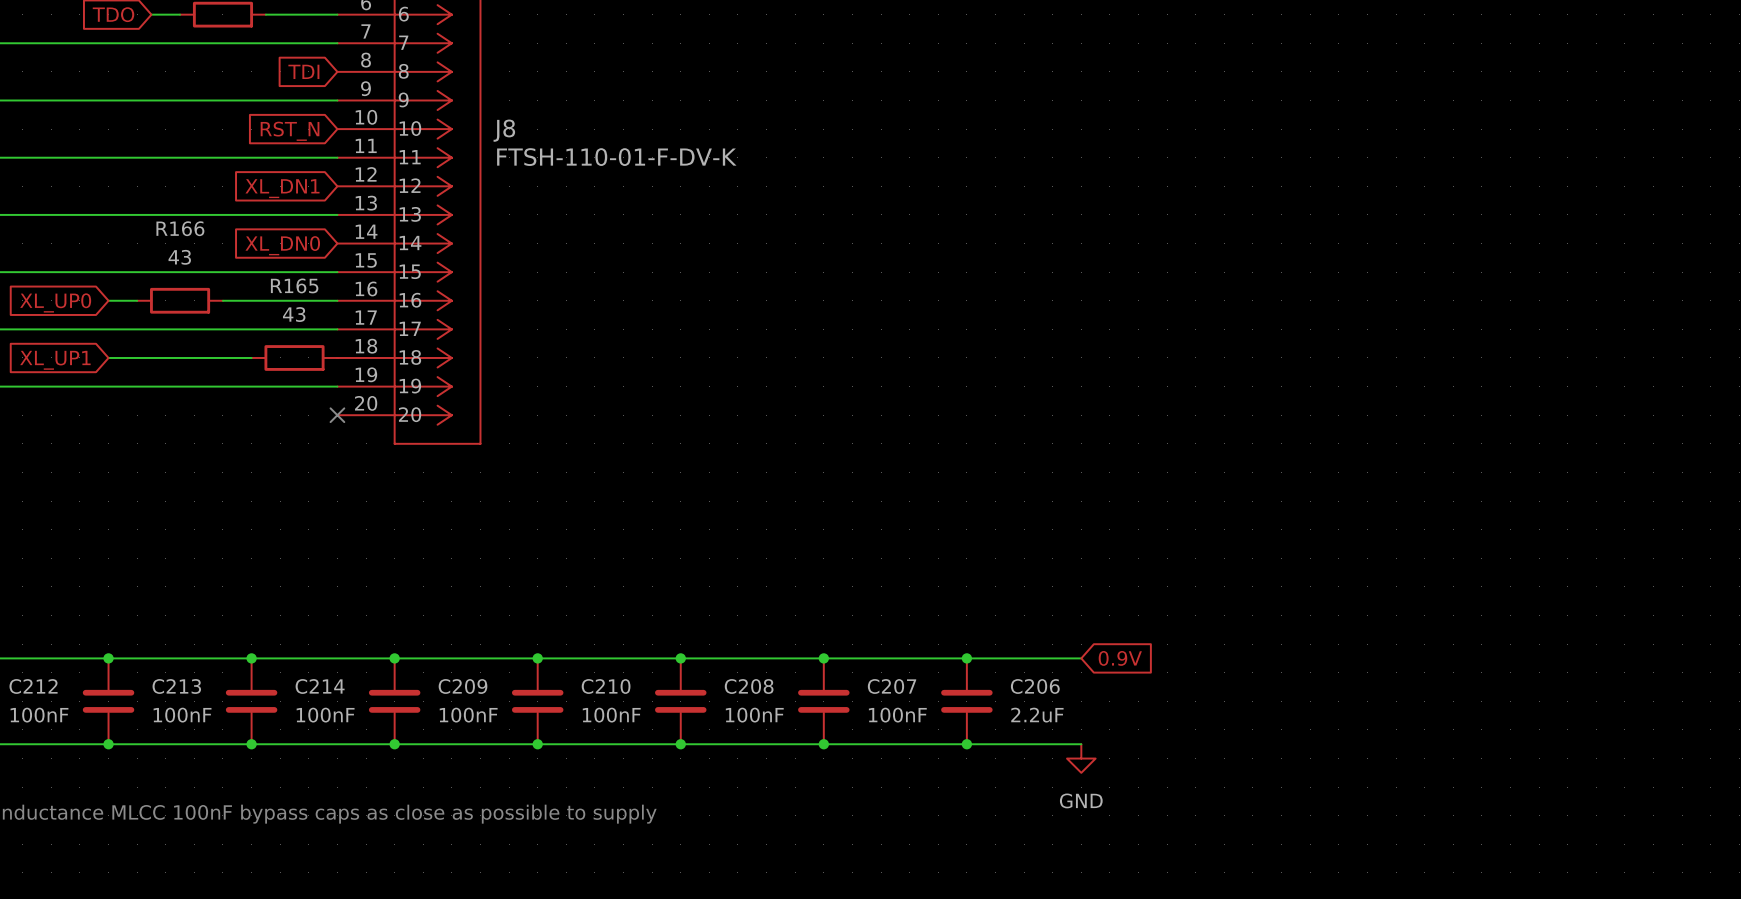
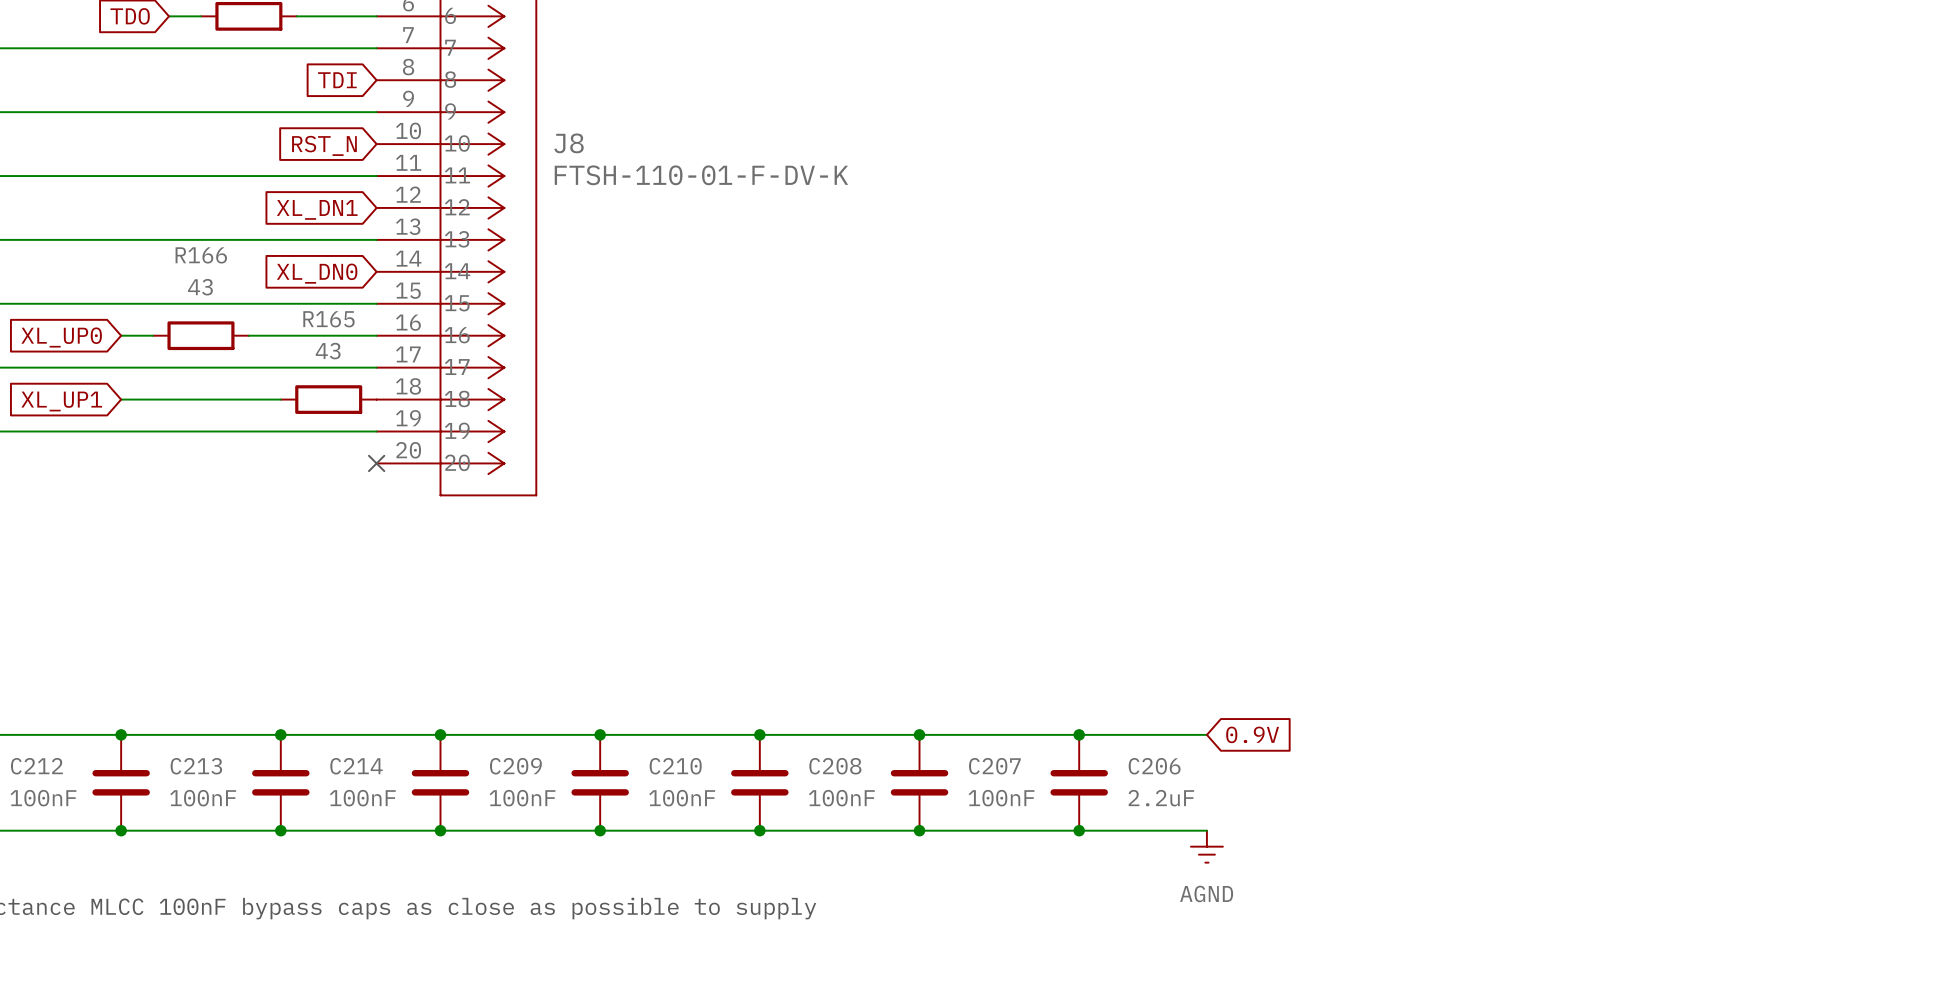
power symbol: GND (1081, 758) -> AGND (1206, 846)

